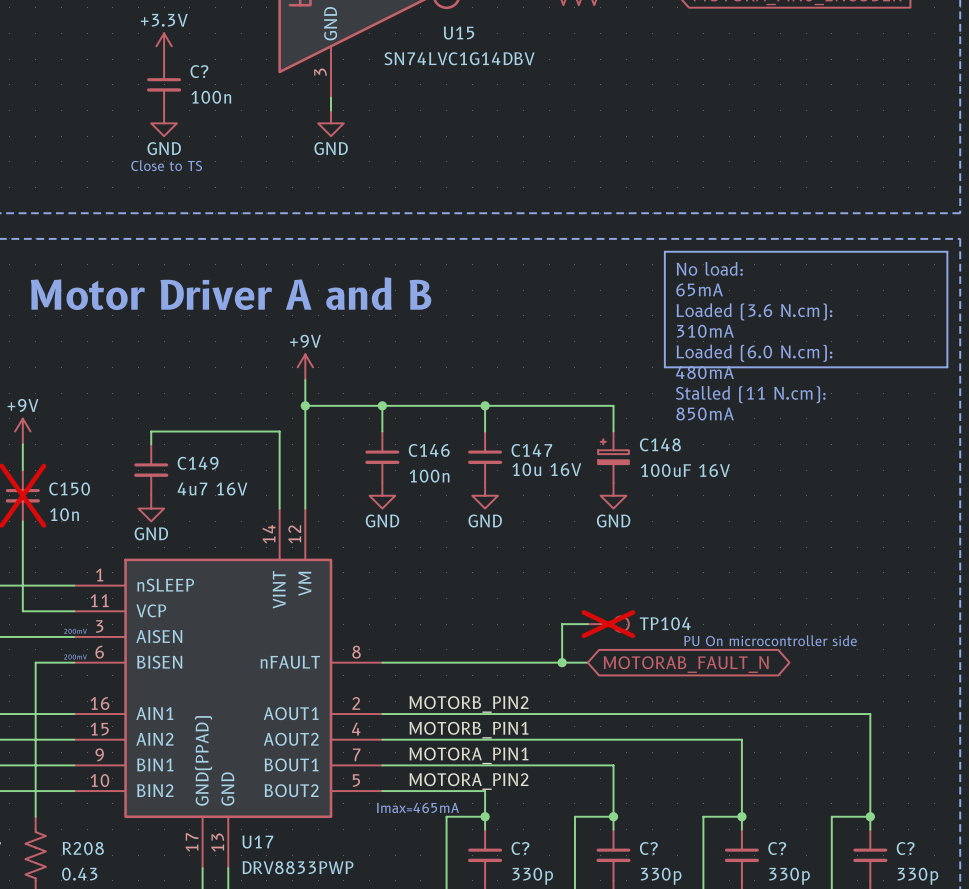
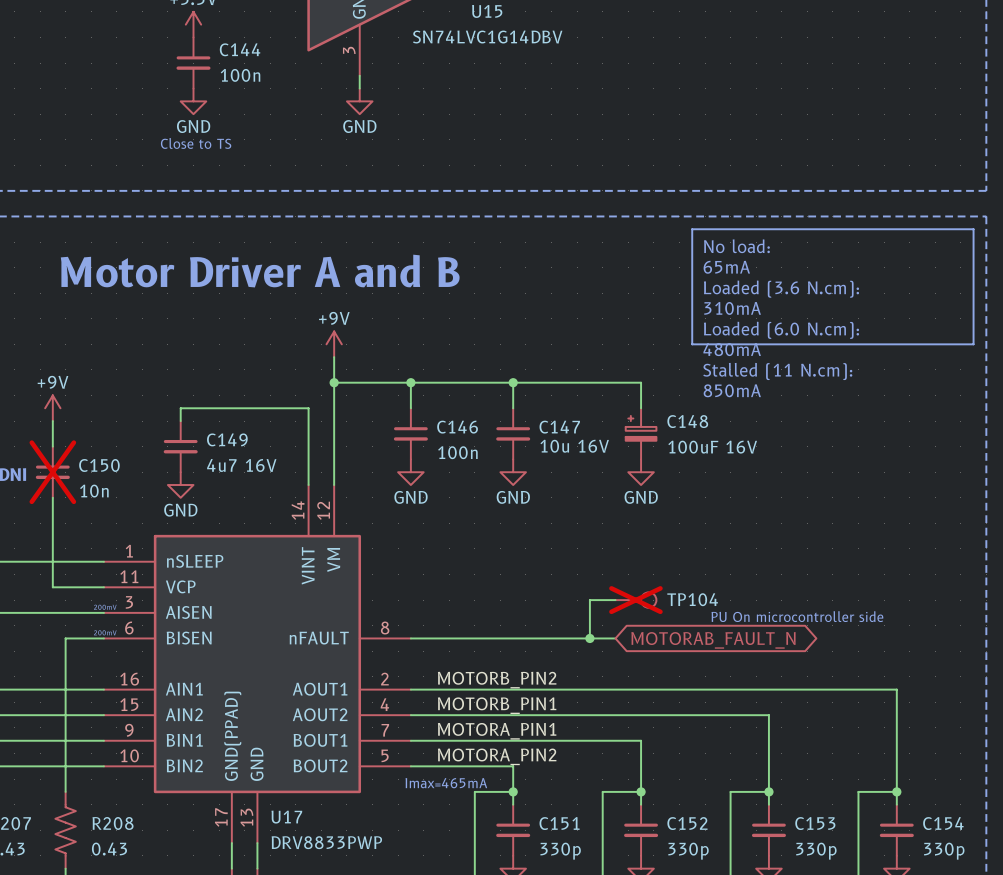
C? name: C? (199, 71) -> C144 (240, 49)
C? name: C? (520, 848) -> C151 (559, 823)
C? name: C? (648, 848) -> C152 (687, 823)
C? name: C? (777, 848) -> C153 (815, 823)
C? name: C? (905, 848) -> C154 (943, 823)

